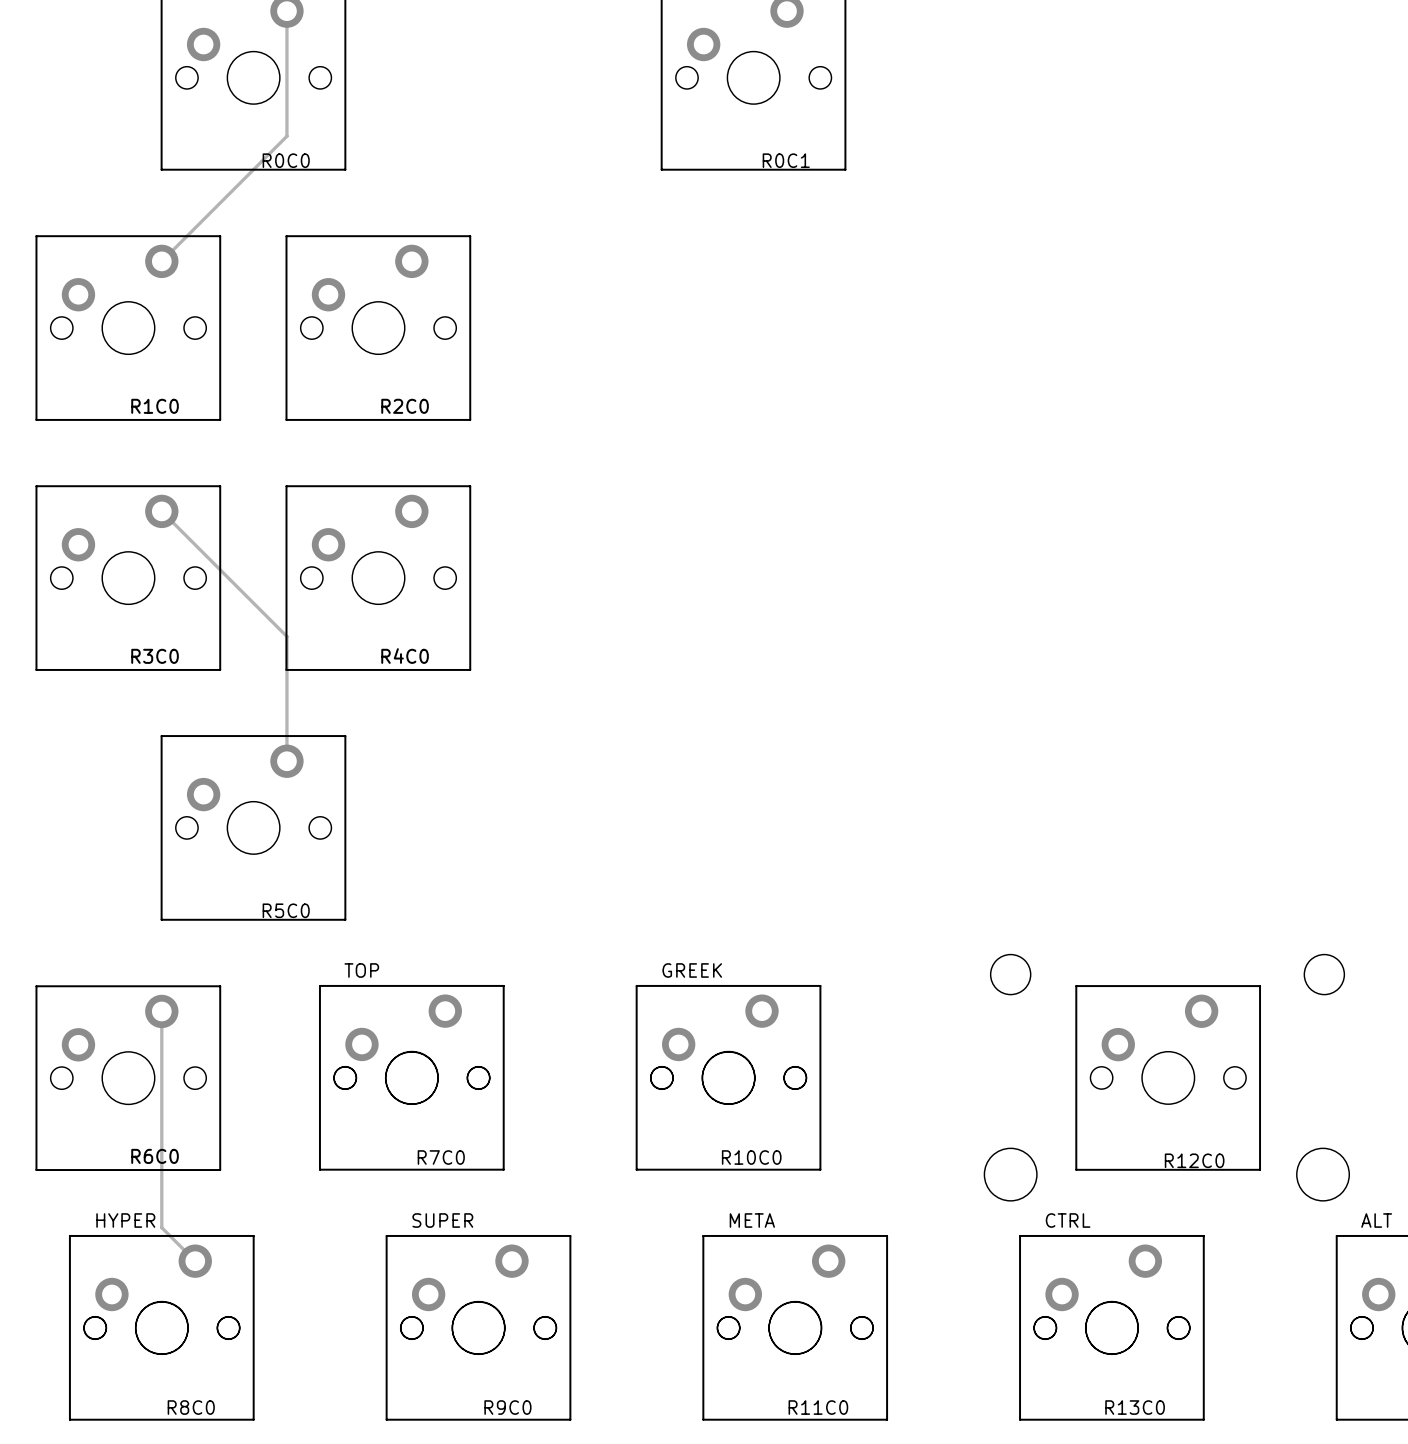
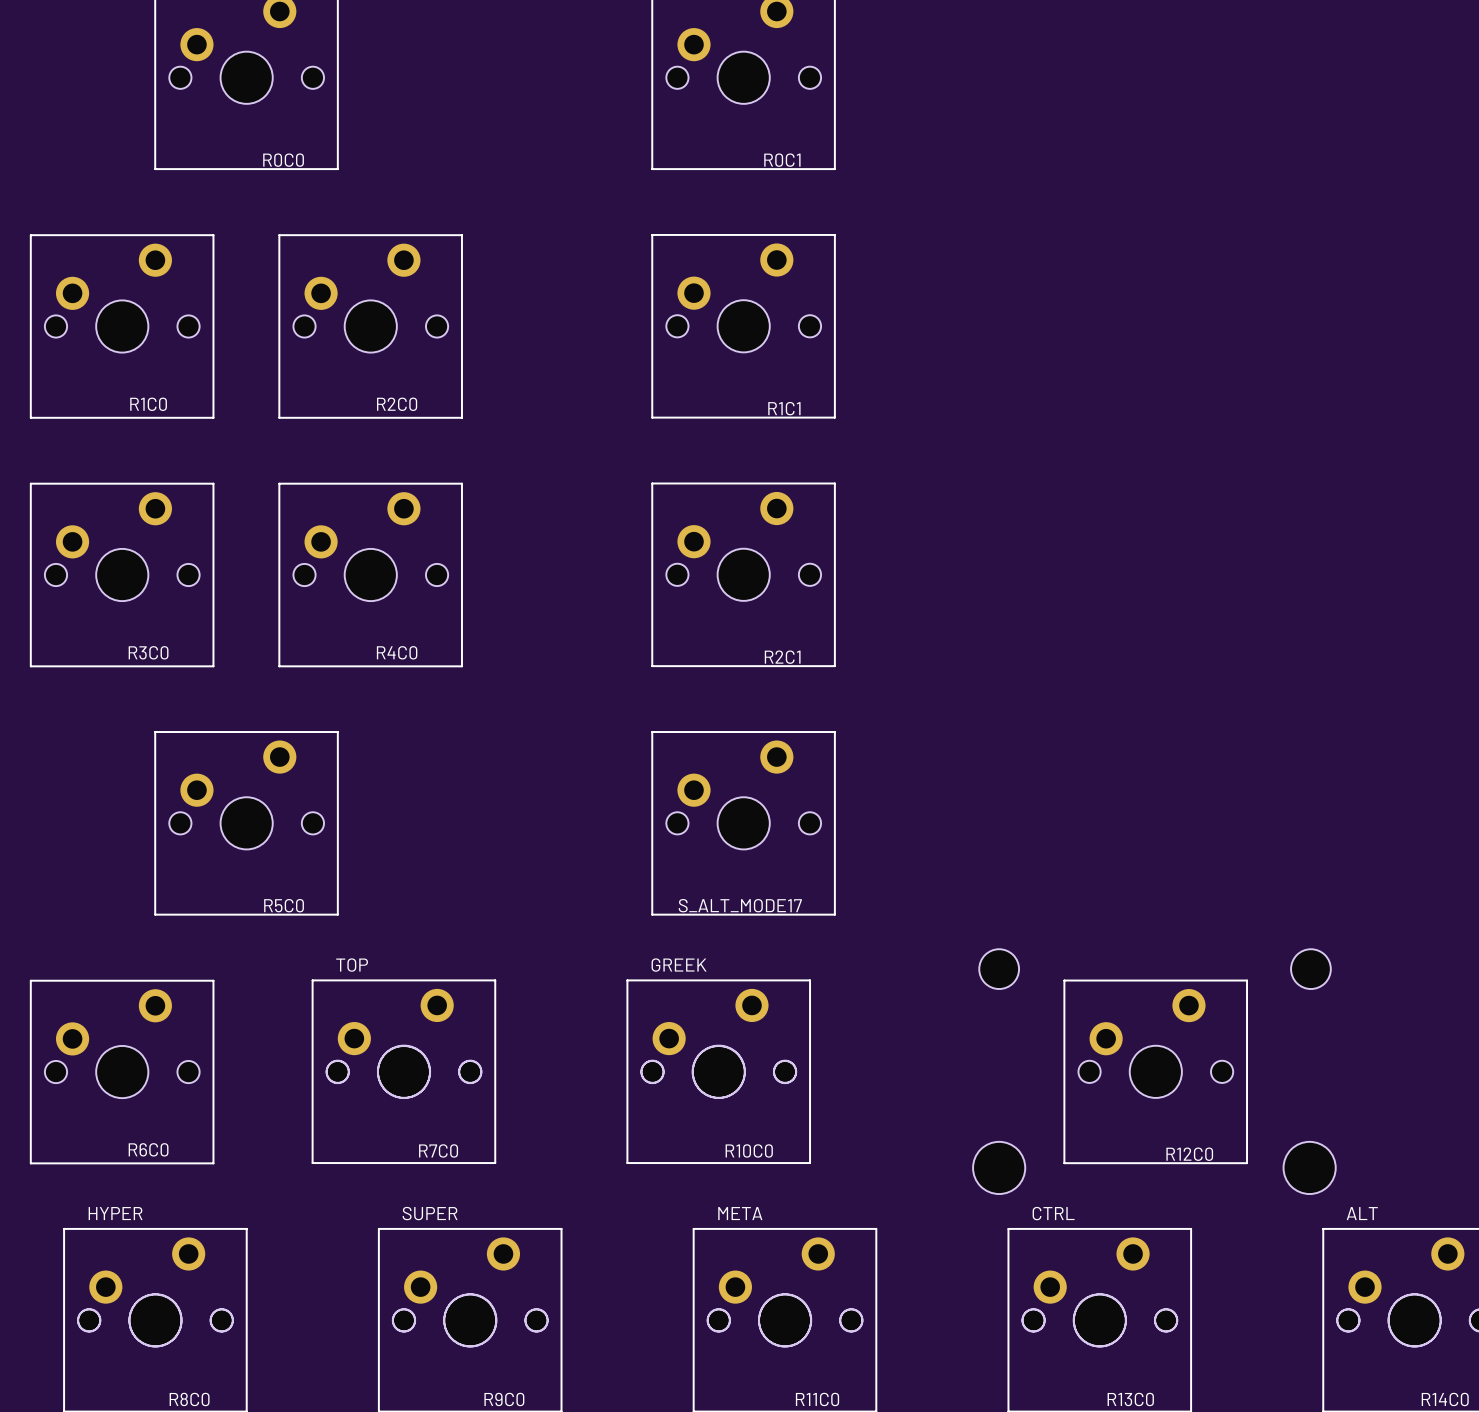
track: (286, 11) (286, 136) (161, 261) -> none
R1C1: none -> (743, 326)
track: (161, 511) (286, 636) (286, 761) -> none
R2C1: none -> (743, 574)
S_ALT_MODE17: none -> (743, 823)
track: (161, 1011) (161, 1227) (195, 1261) -> none

